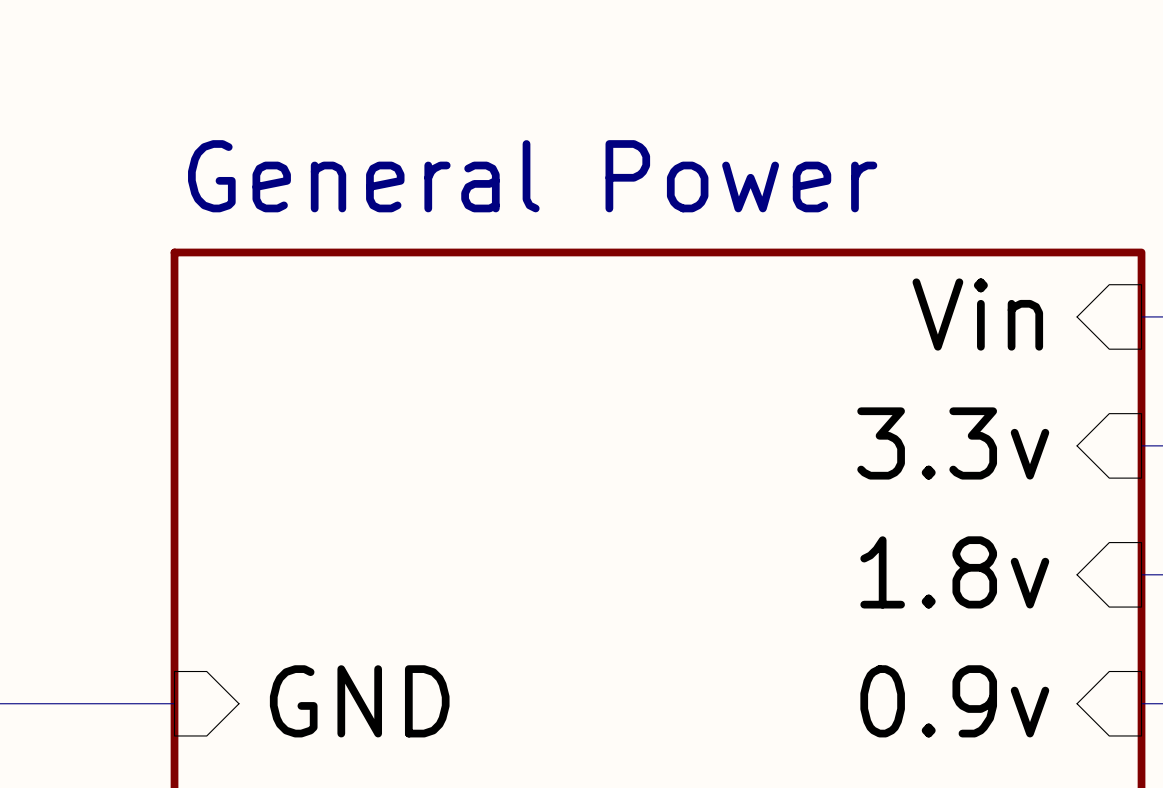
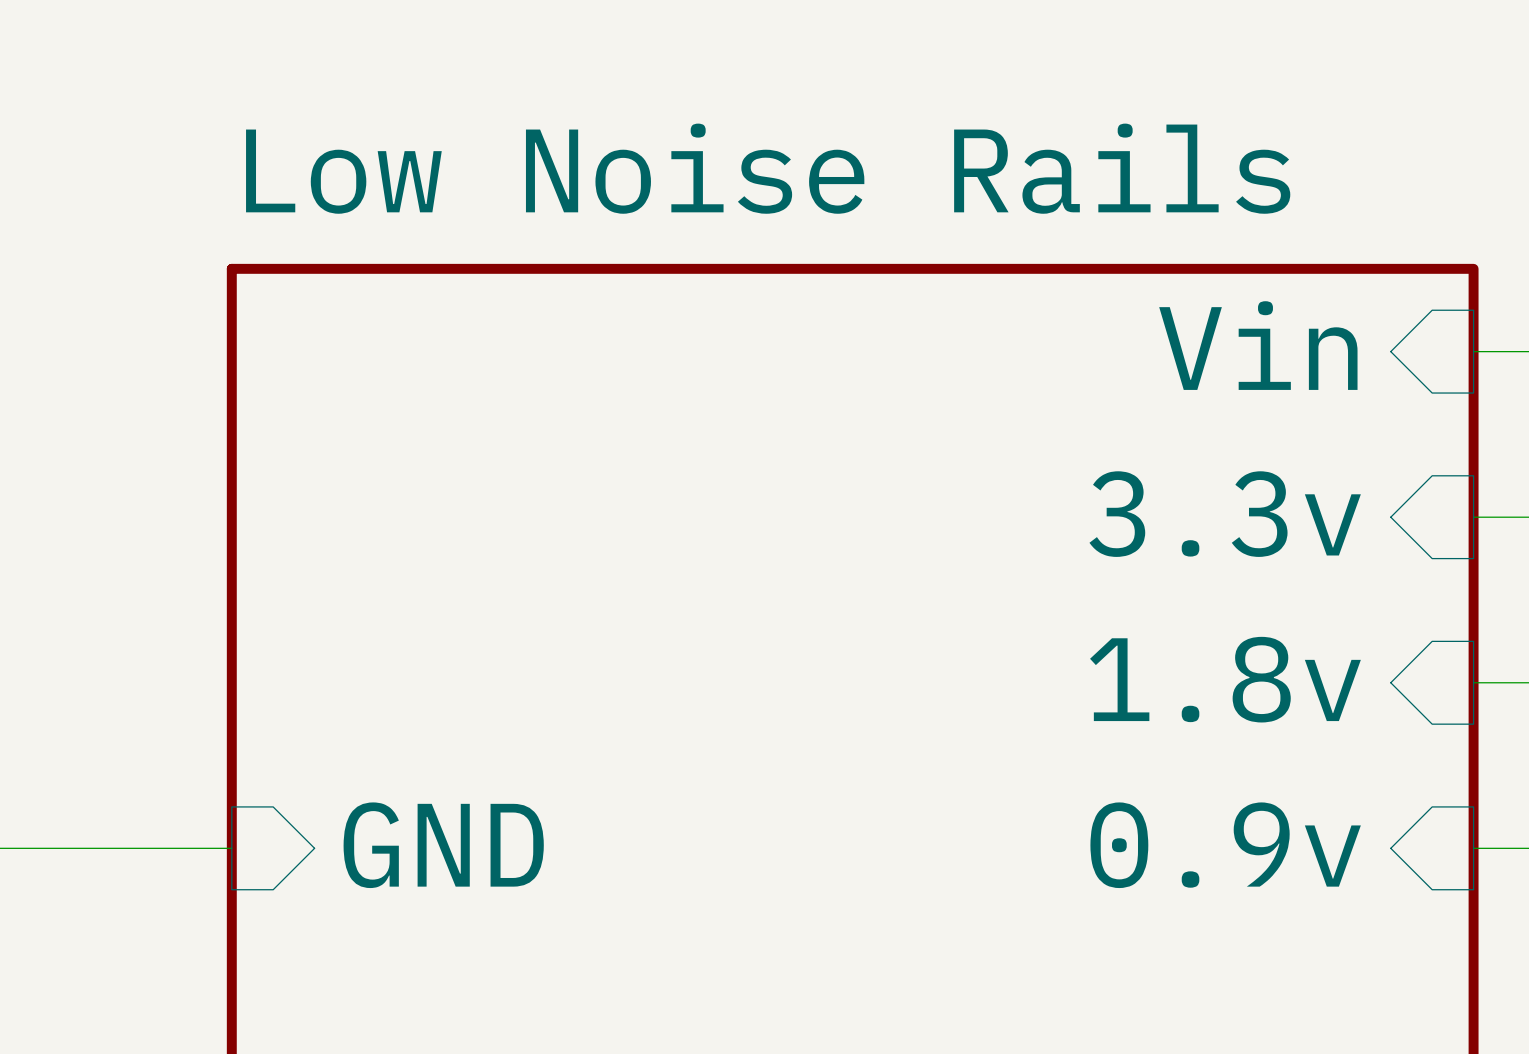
sheet General Power name: General Power (532, 176) -> Low Noise Rails (768, 168)

